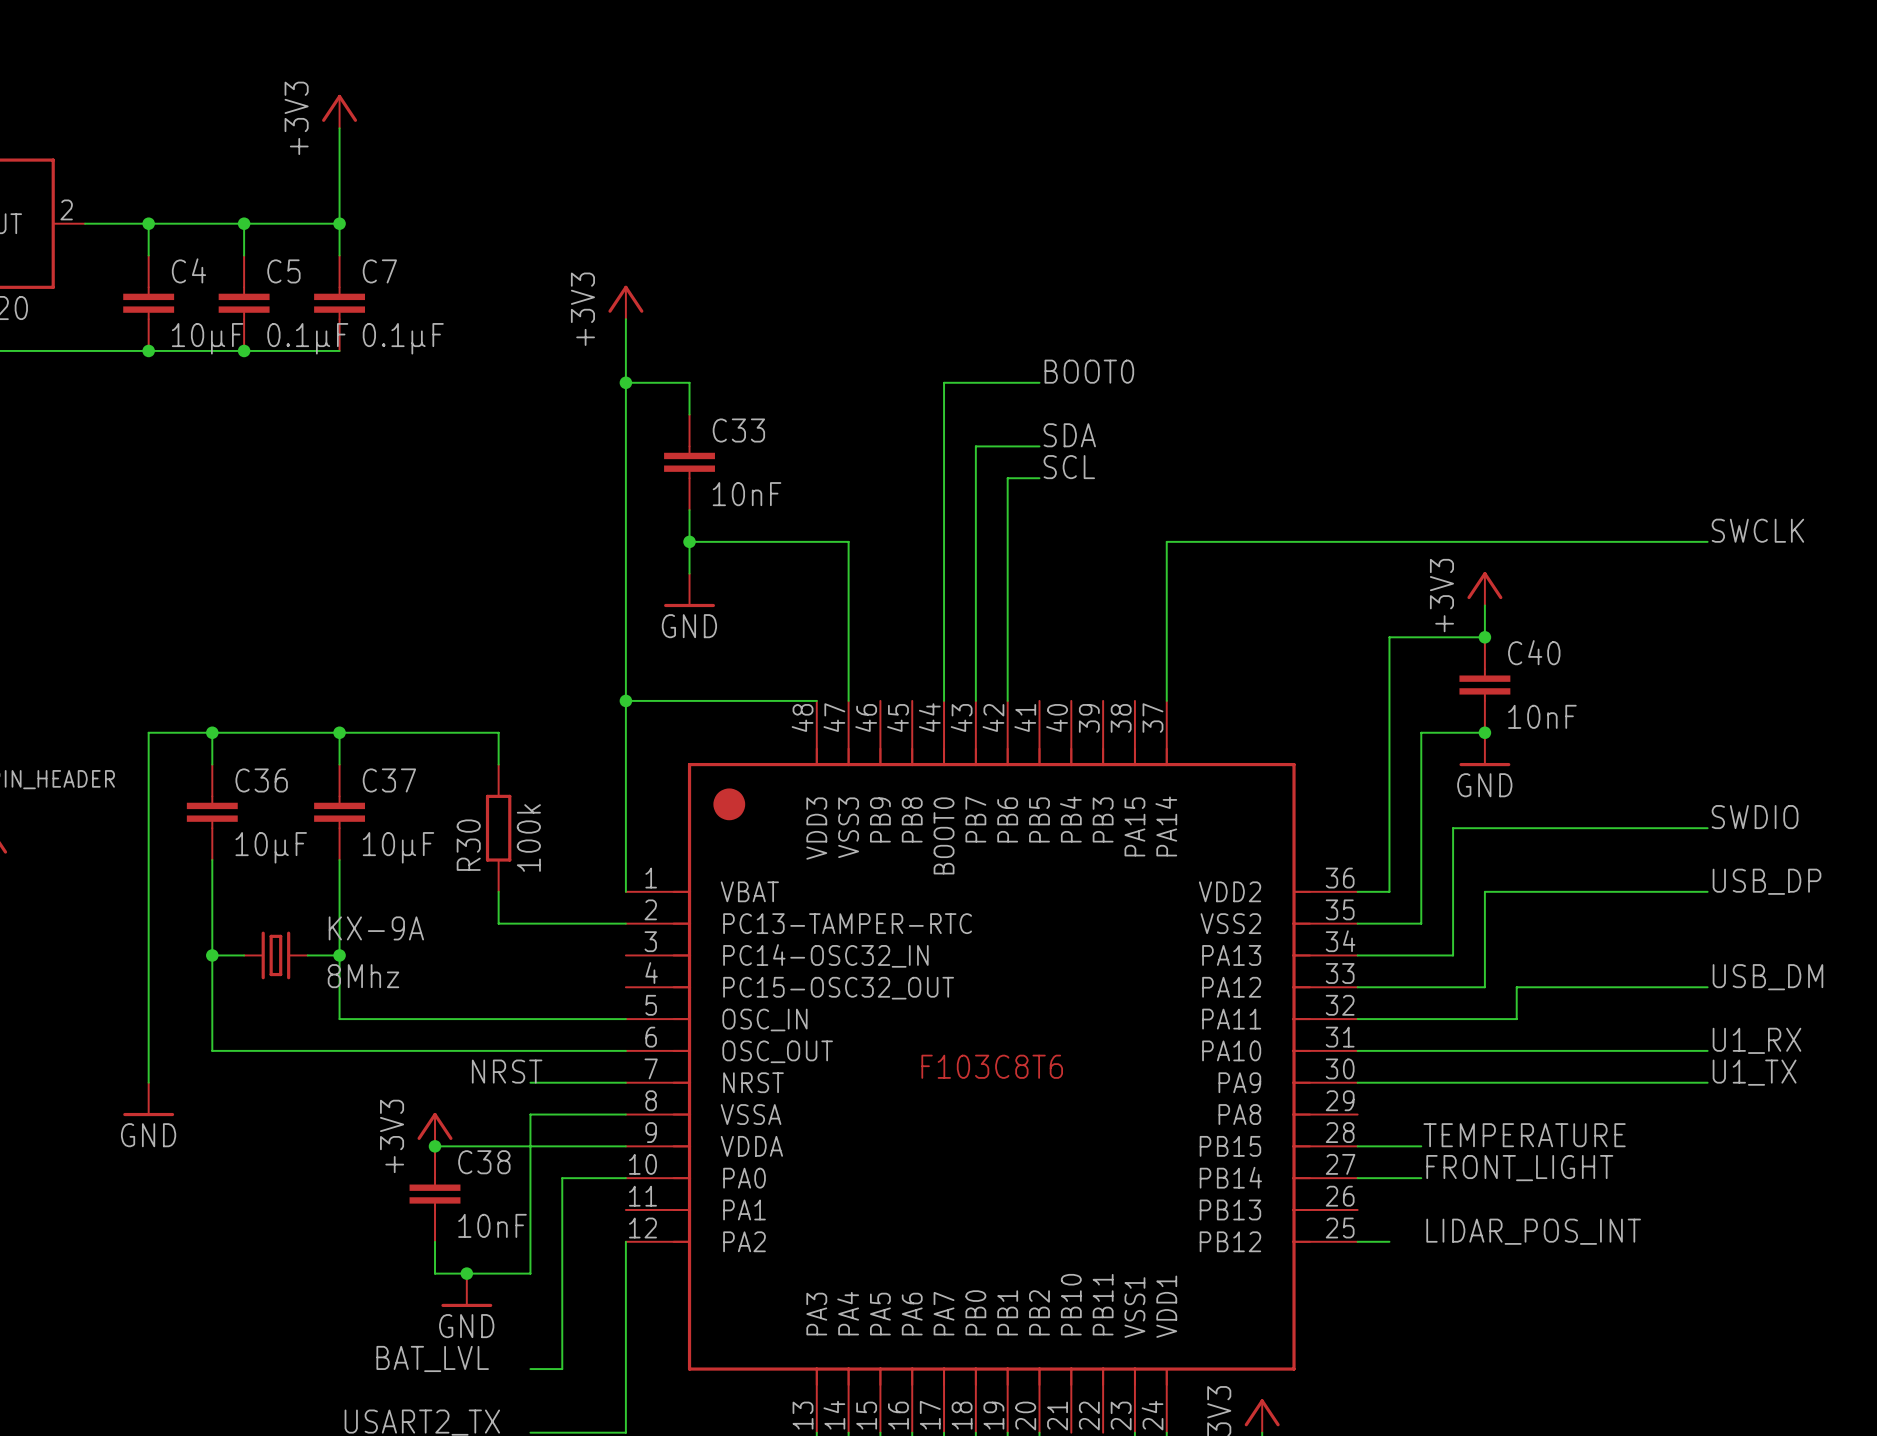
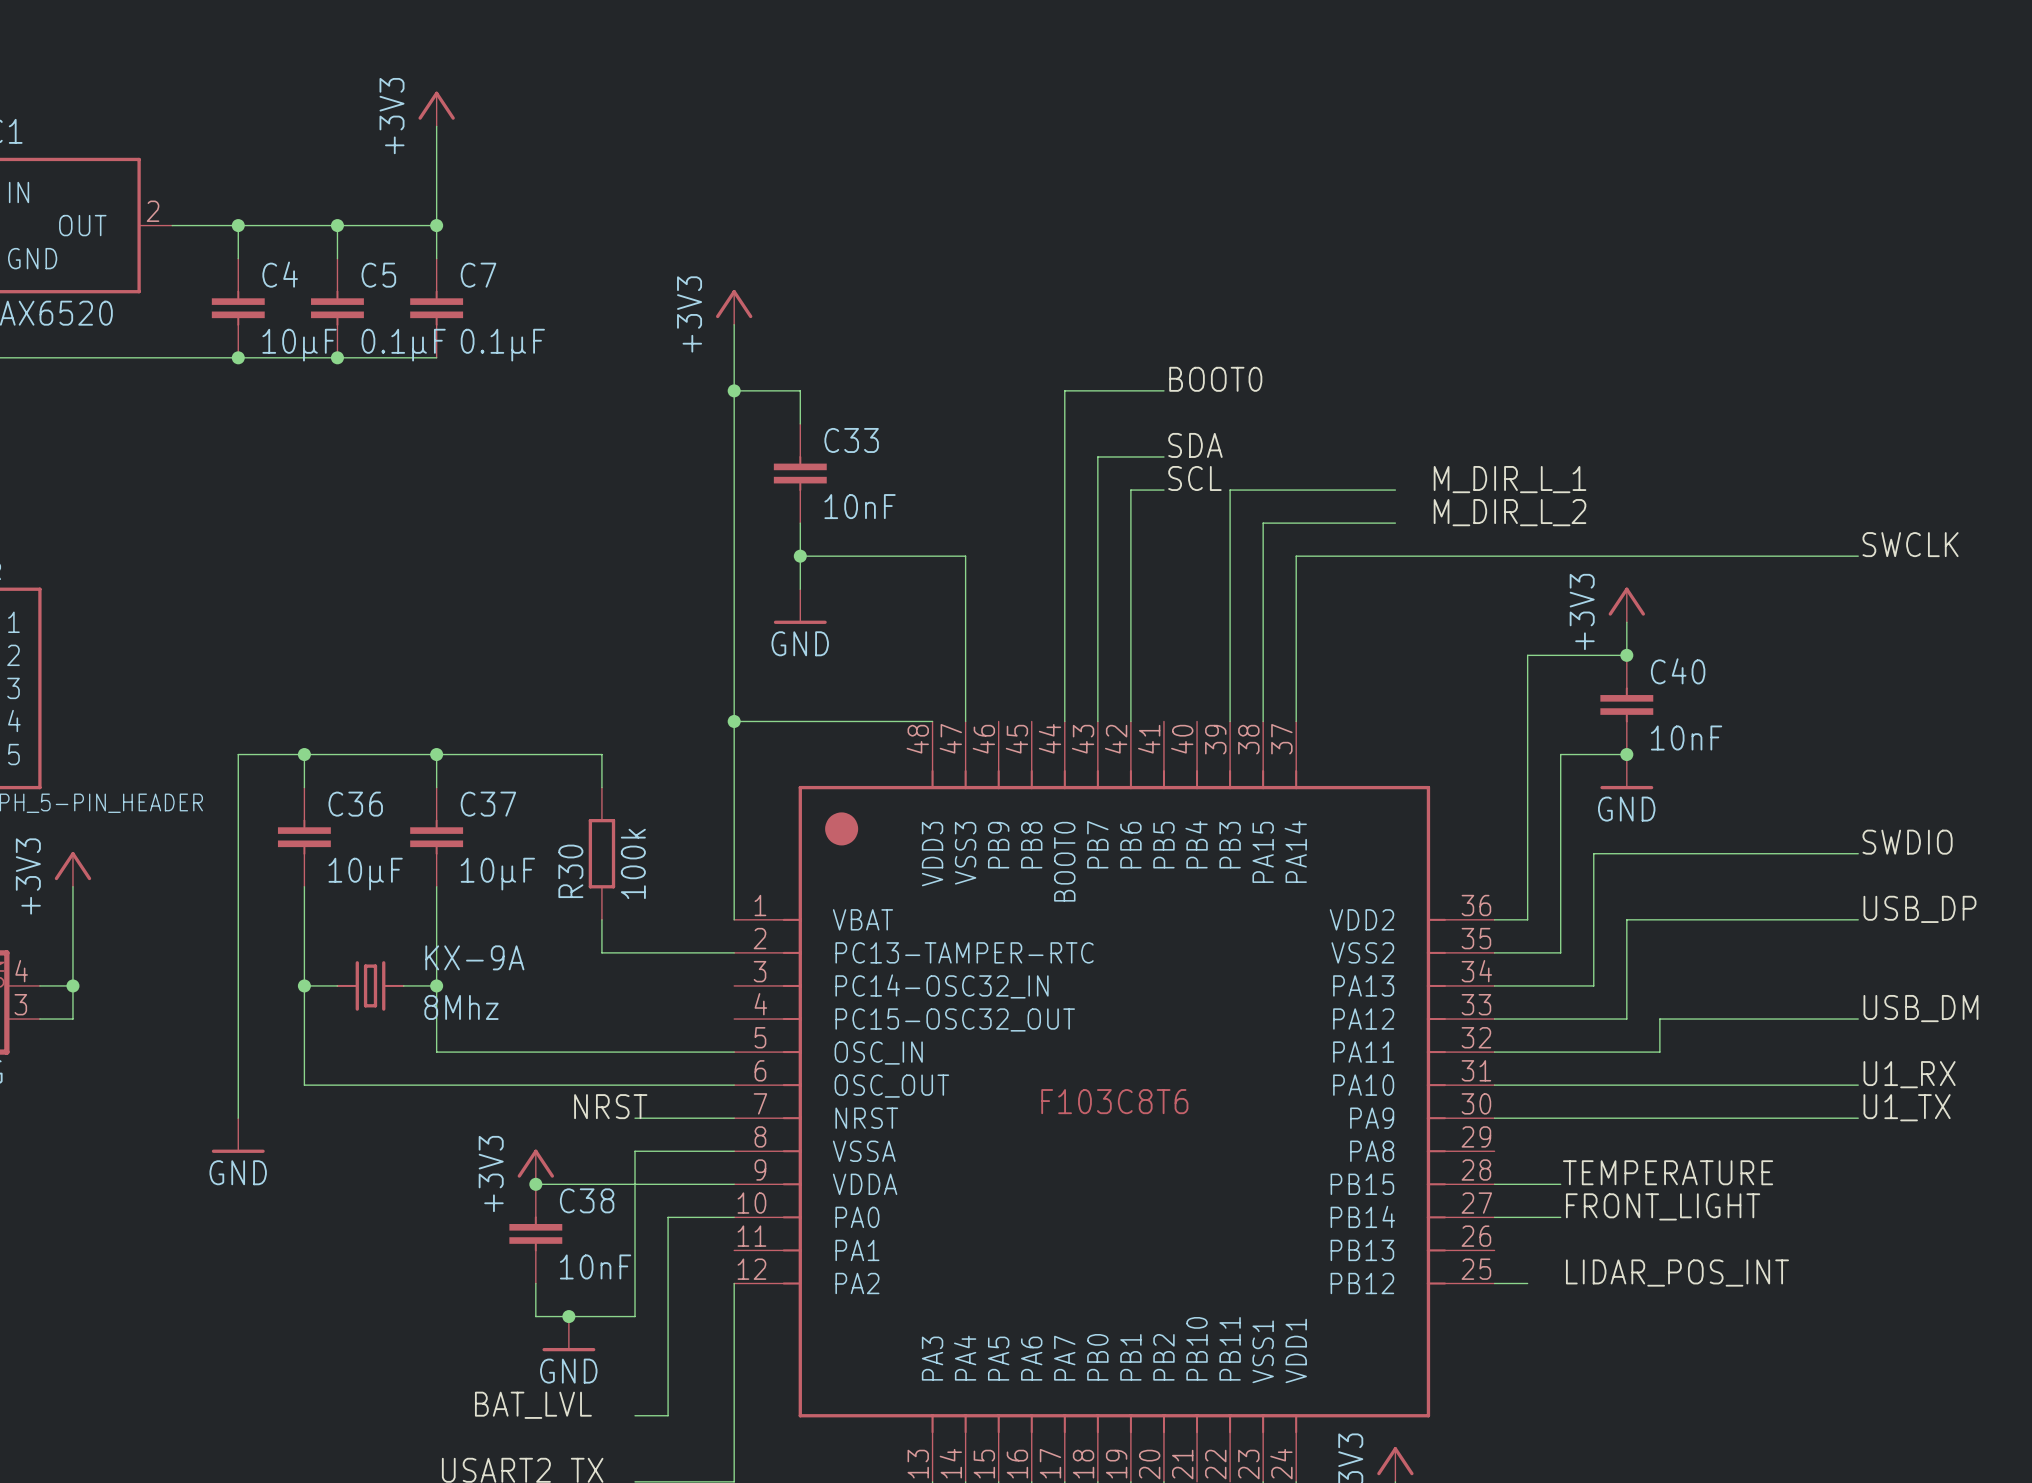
label: none -> M_DIR_L_1 (1510, 479)
wire: none -> (1395, 490) (1230, 490) (1230, 721)
label: none -> M_DIR_L_2 (1510, 512)
wire: none -> (1395, 523) (1263, 523) (1263, 721)

